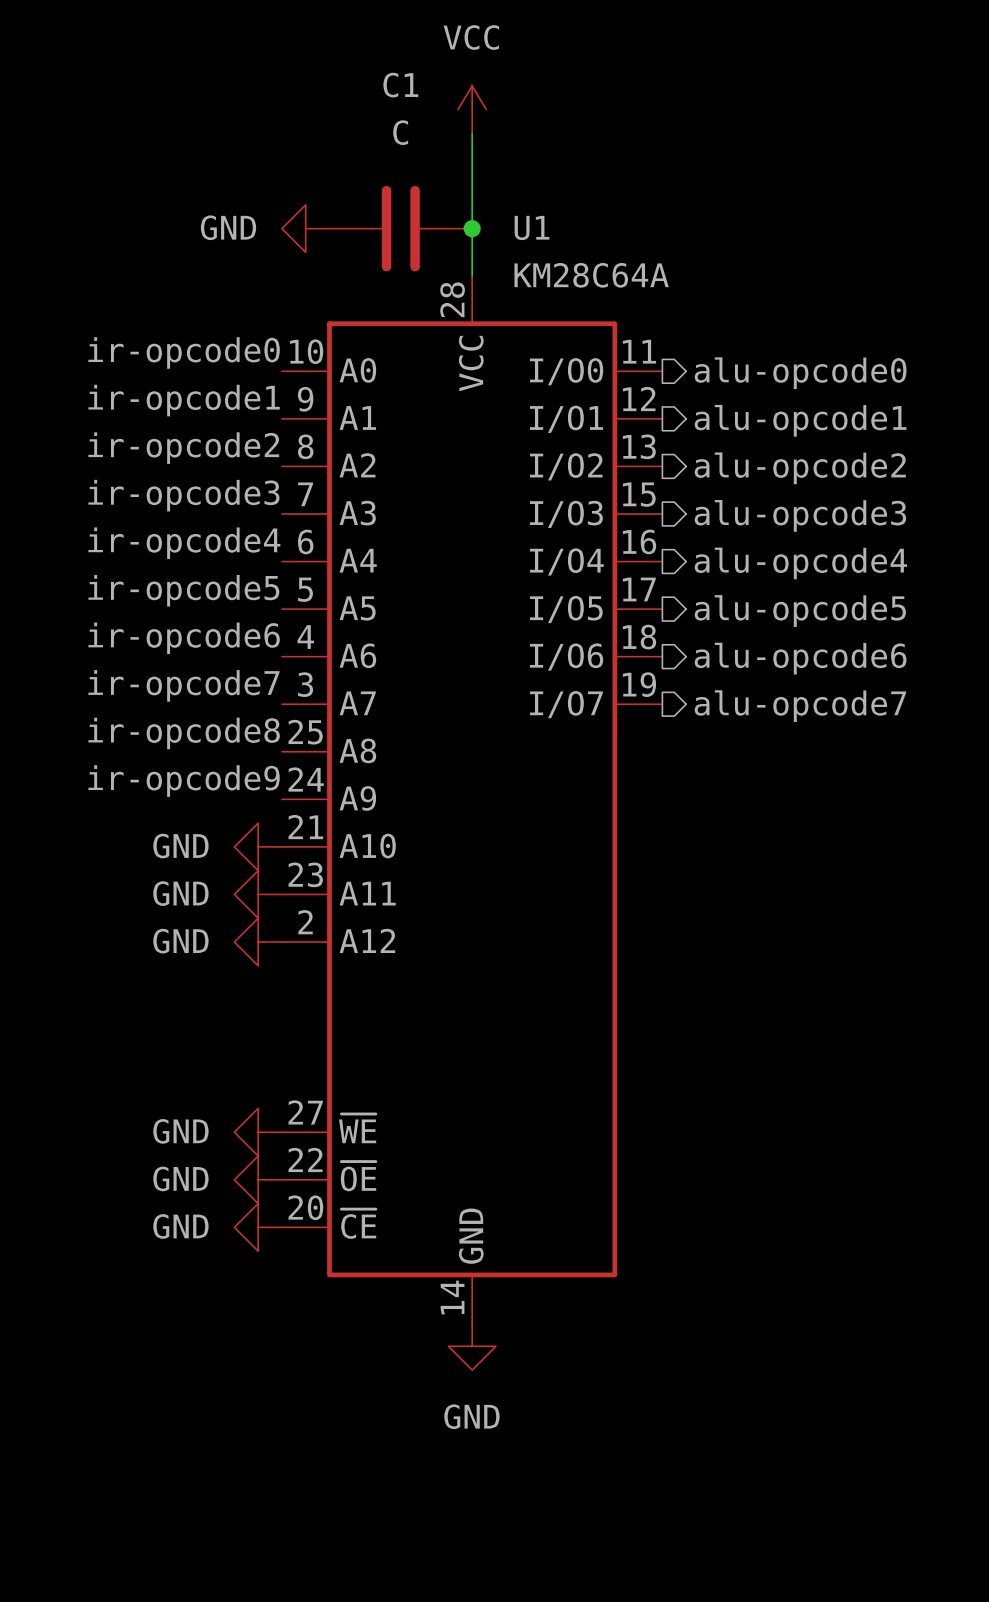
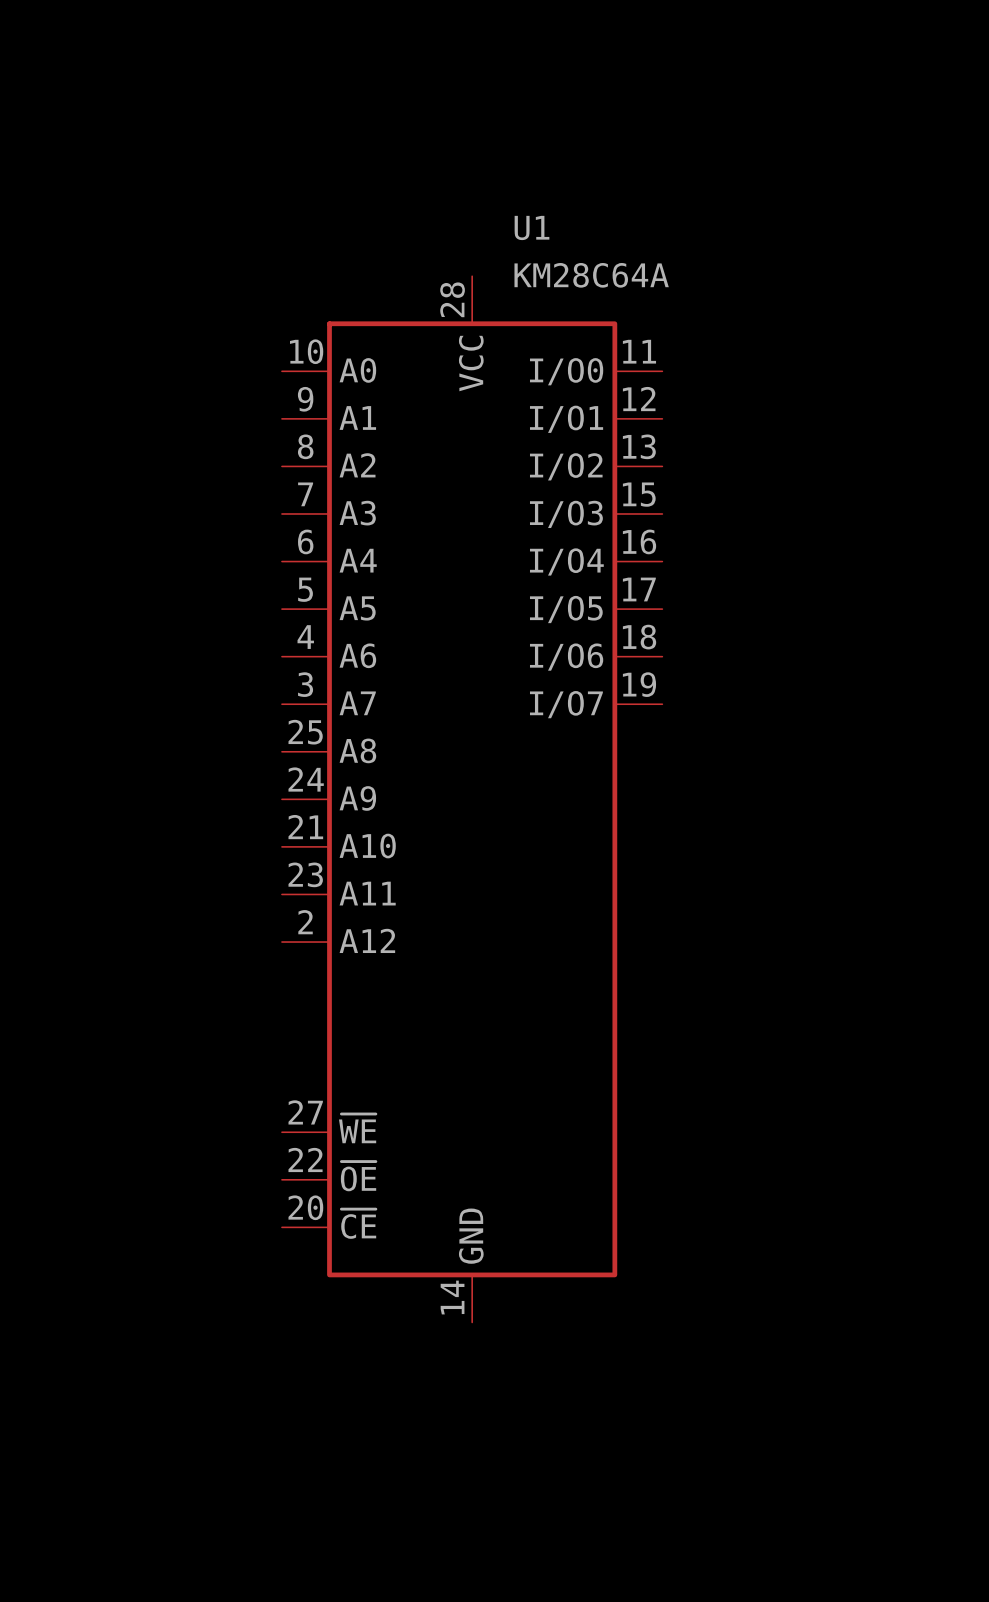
power symbol: VCC (472, 109) -> none
wire: (472, 133) (472, 276) -> none
power symbol: GND (305, 228) -> none
C1: C (400, 228) -> none
junction: (472, 228) -> none
label: ir-opcode0 (184, 352) -> none
hierarchical label: alu-opcode0 (800, 373) -> none
label: ir-opcode1 (184, 400) -> none
hierarchical label: alu-opcode1 (800, 420) -> none
label: ir-opcode2 (183, 448) -> none
hierarchical label: alu-opcode2 (800, 468) -> none
label: ir-opcode3 (183, 495) -> none
hierarchical label: alu-opcode3 (800, 515) -> none
label: ir-opcode4 (184, 543) -> none
hierarchical label: alu-opcode4 (800, 563) -> none
label: ir-opcode5 (183, 590) -> none
hierarchical label: alu-opcode5 (800, 611) -> none
label: ir-opcode6 (184, 638) -> none
hierarchical label: alu-opcode6 (800, 658) -> none
label: ir-opcode7 (183, 685) -> none
hierarchical label: alu-opcode7 (800, 706) -> none
label: ir-opcode8 (184, 733) -> none
label: ir-opcode9 (184, 781) -> none
power symbol: GND (258, 846) -> none
power symbol: GND (258, 894) -> none
power symbol: GND (258, 942) -> none
power symbol: GND (258, 1132) -> none
power symbol: GND (258, 1179) -> none
power symbol: GND (258, 1227) -> none
power symbol: GND (472, 1346) -> none

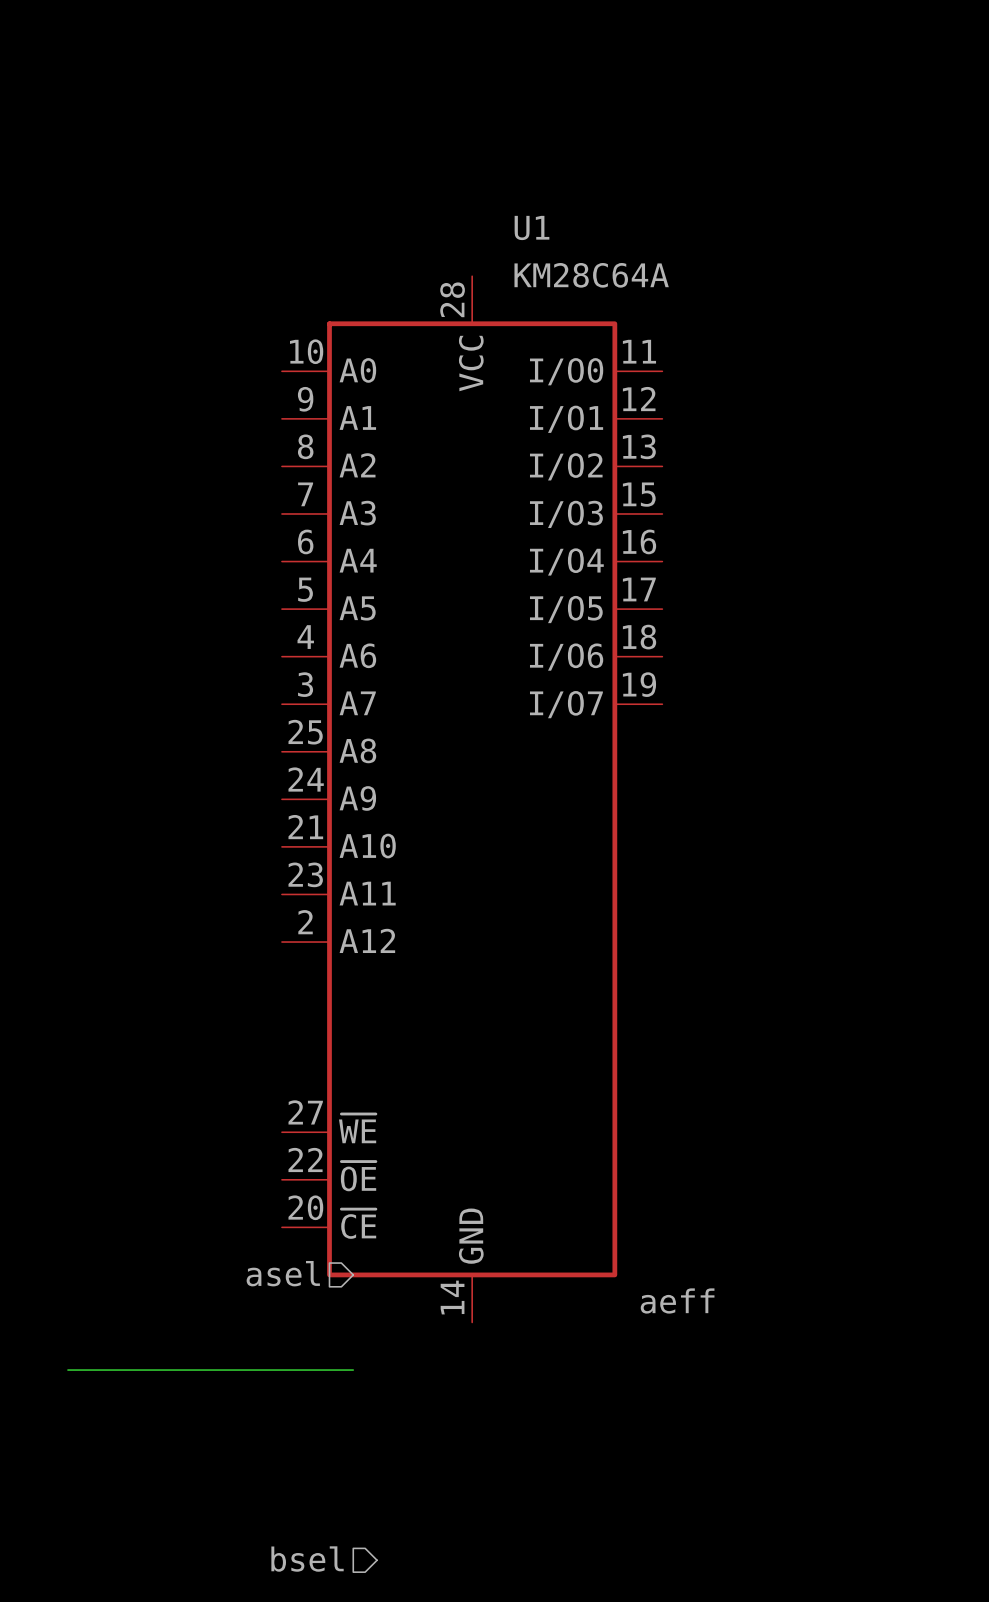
hierarchical label: none -> asel (283, 1273)
label: none -> aeff (677, 1300)
wire: none -> (67, 1370) (353, 1370)
hierarchical label: none -> bsel (307, 1559)

